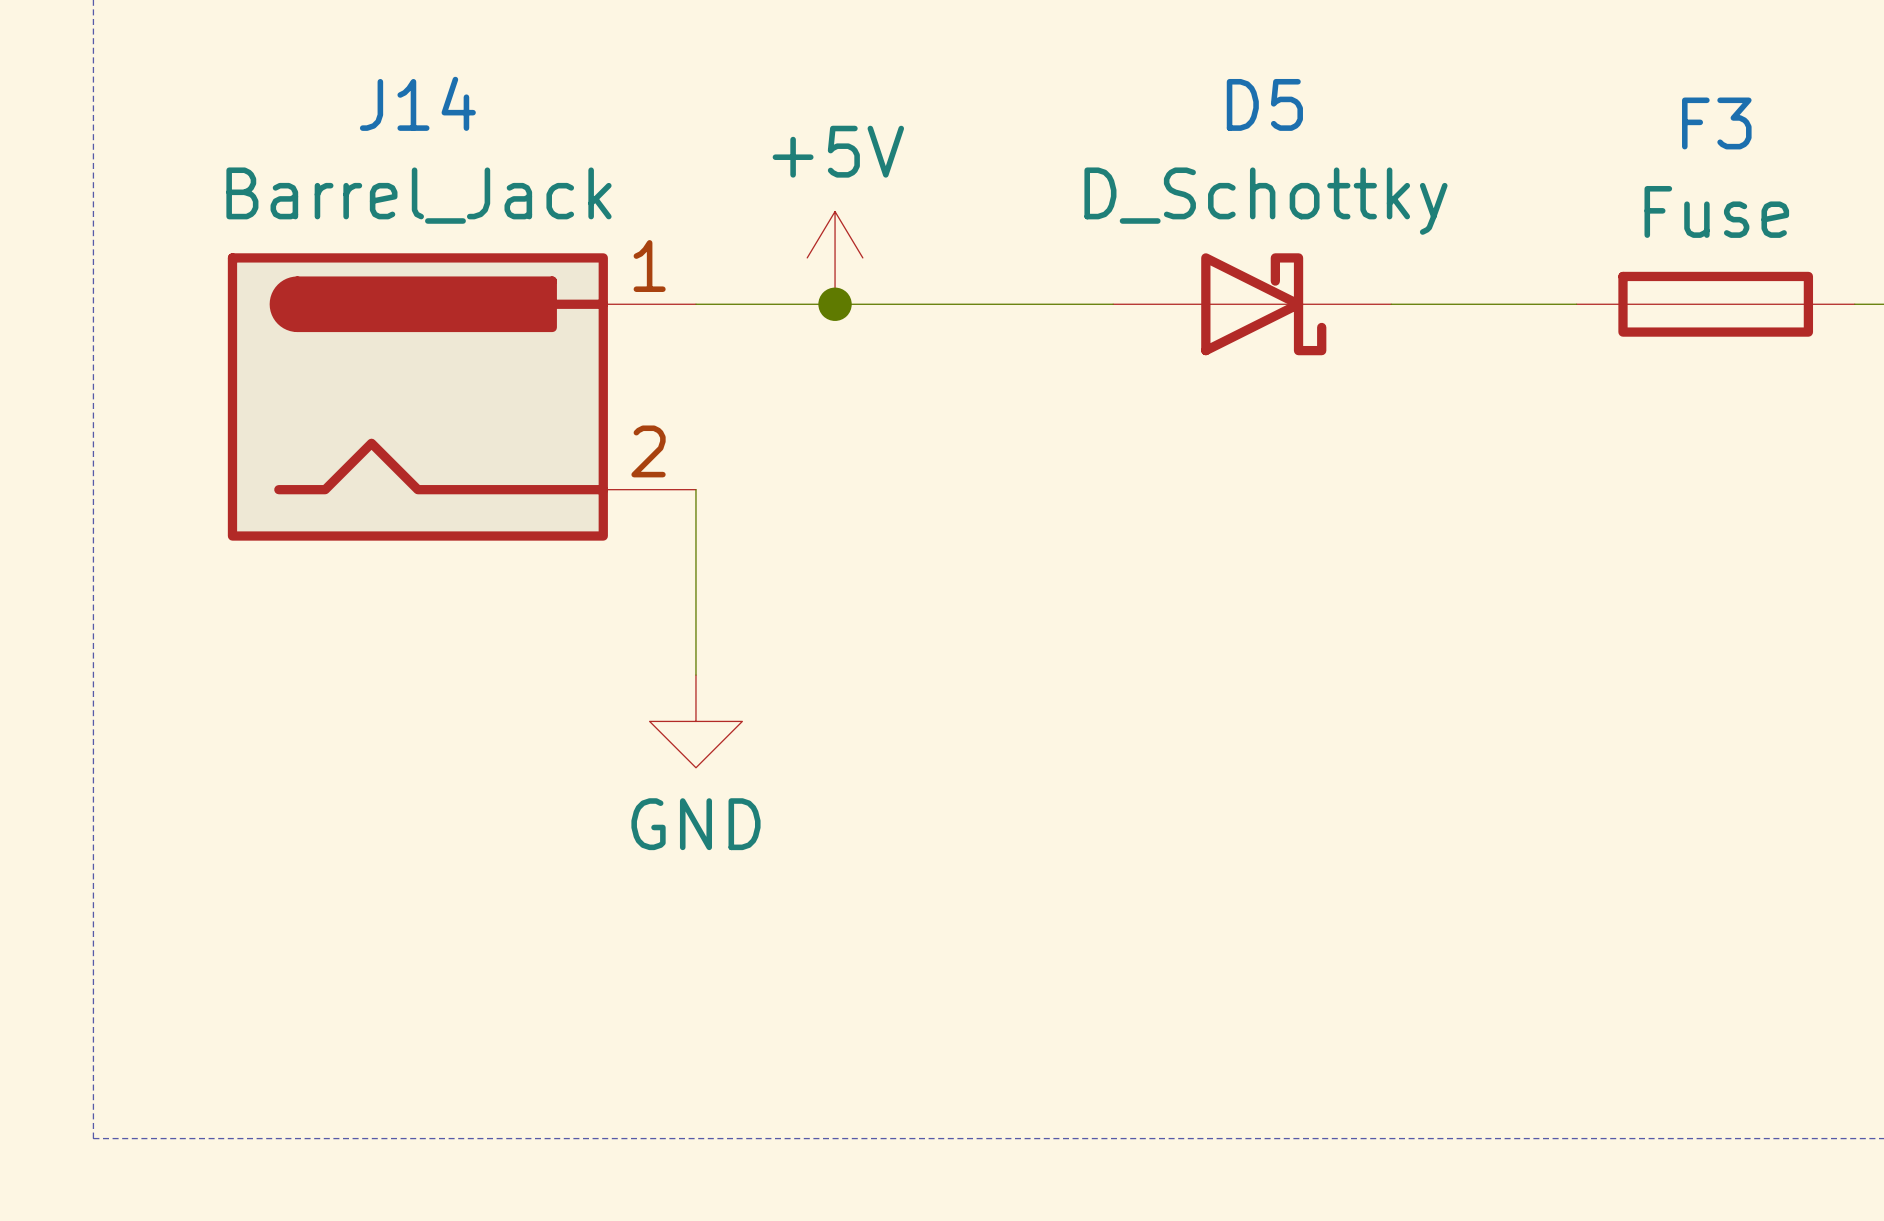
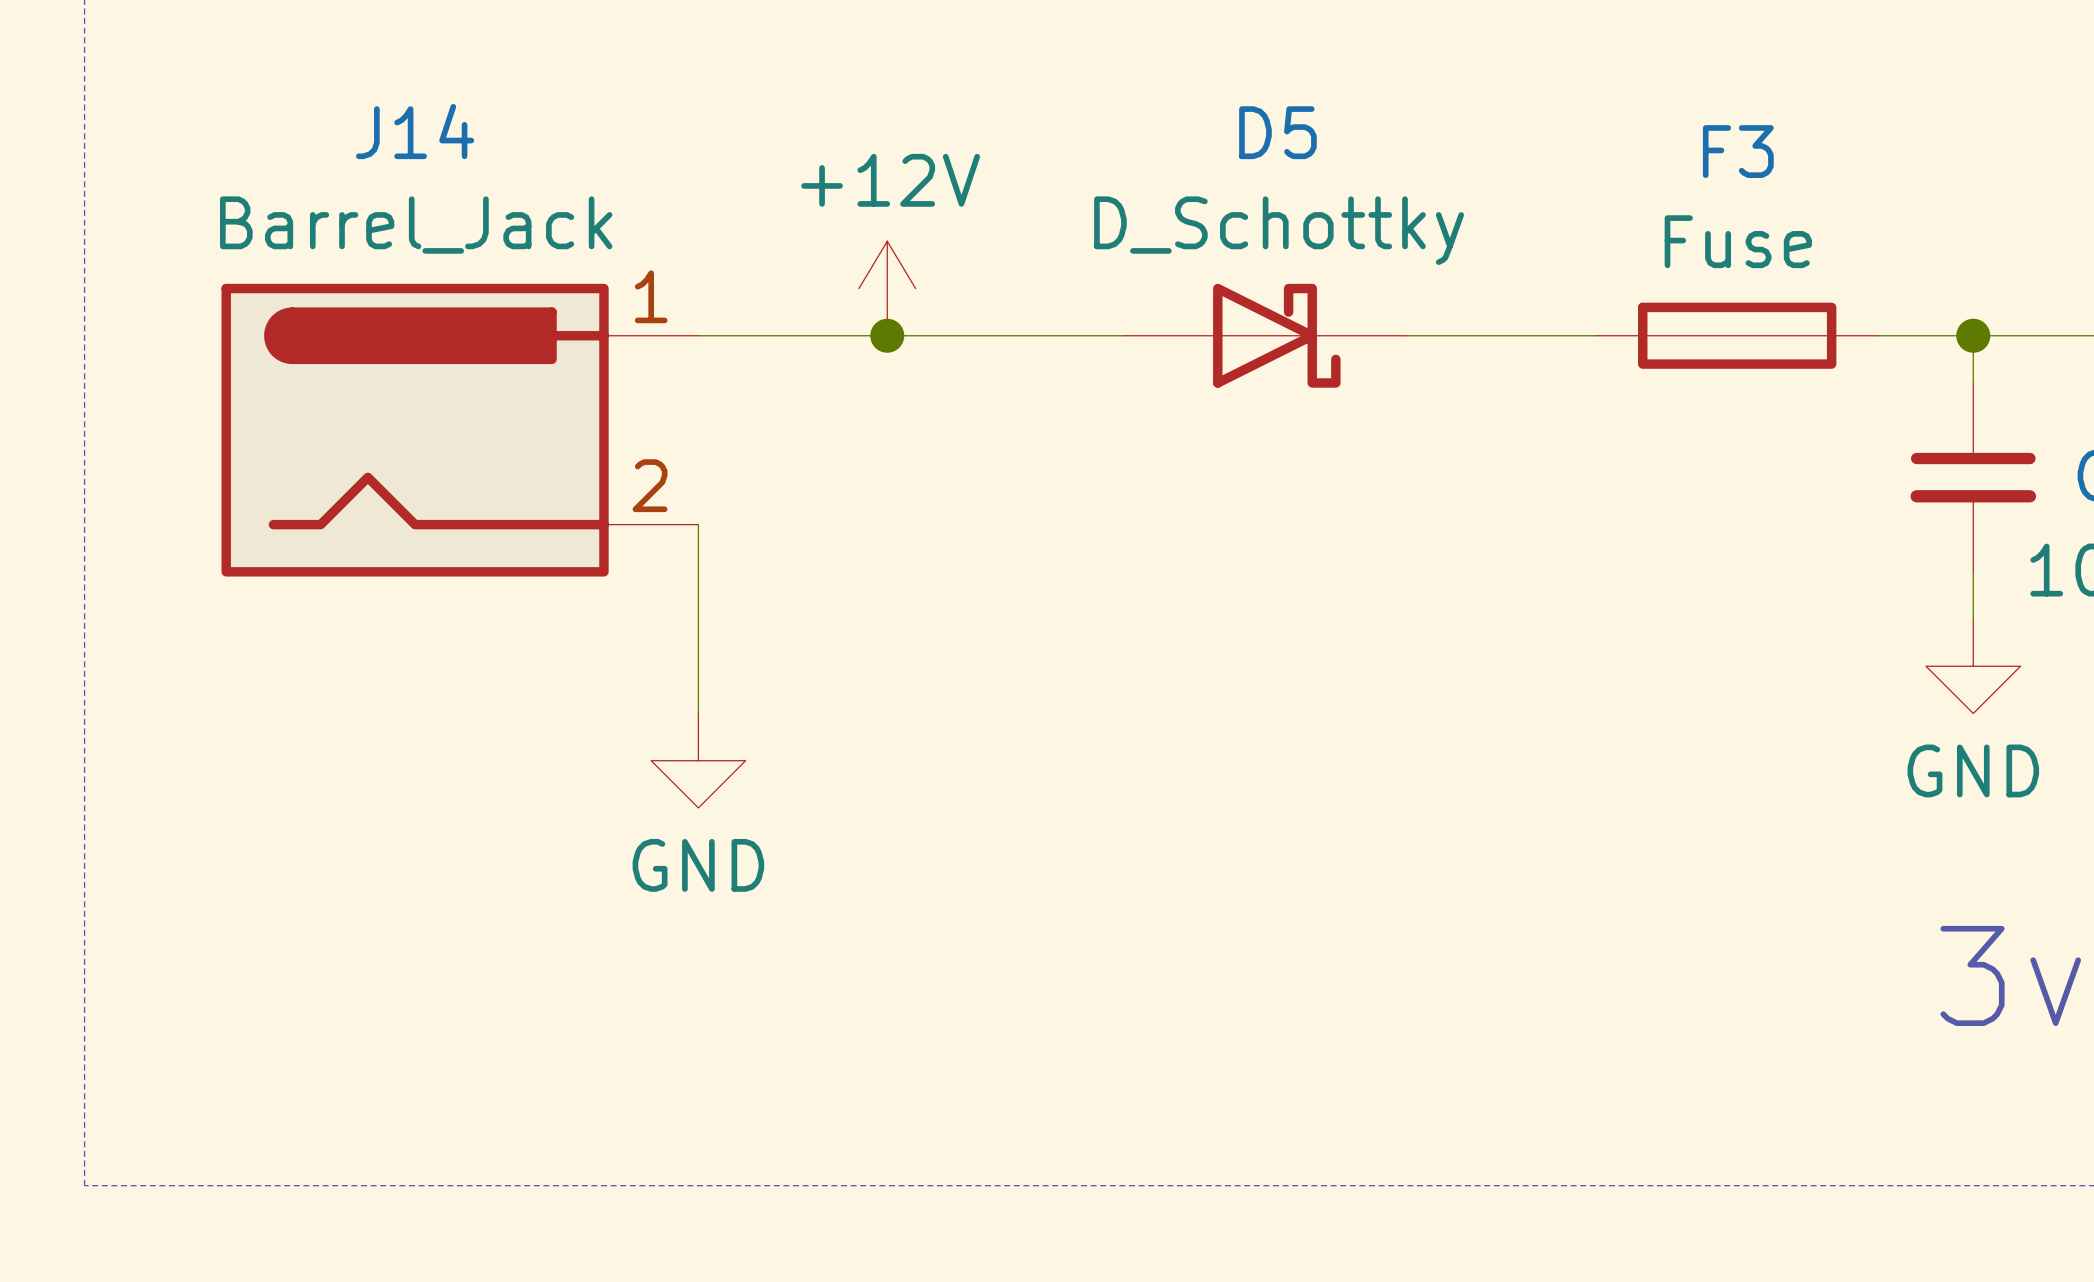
power symbol: +5V (835, 257) -> none
power symbol: none -> +12V (887, 288)
junction position: (835, 304) -> (887, 335)

